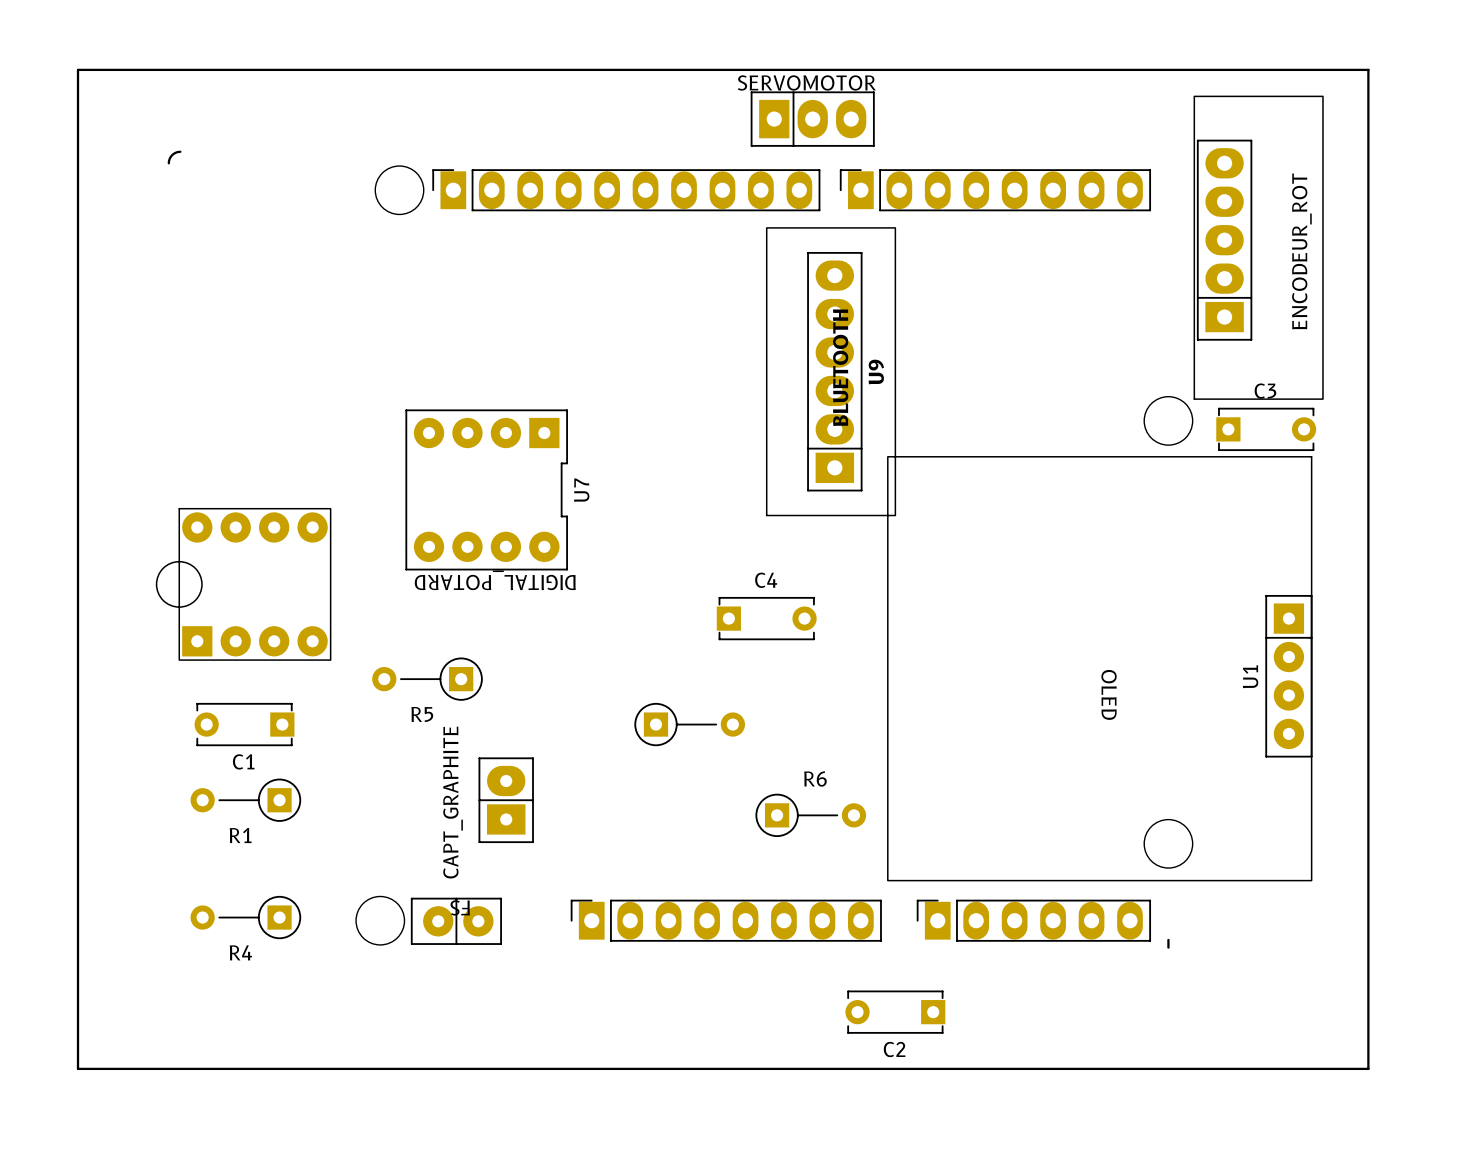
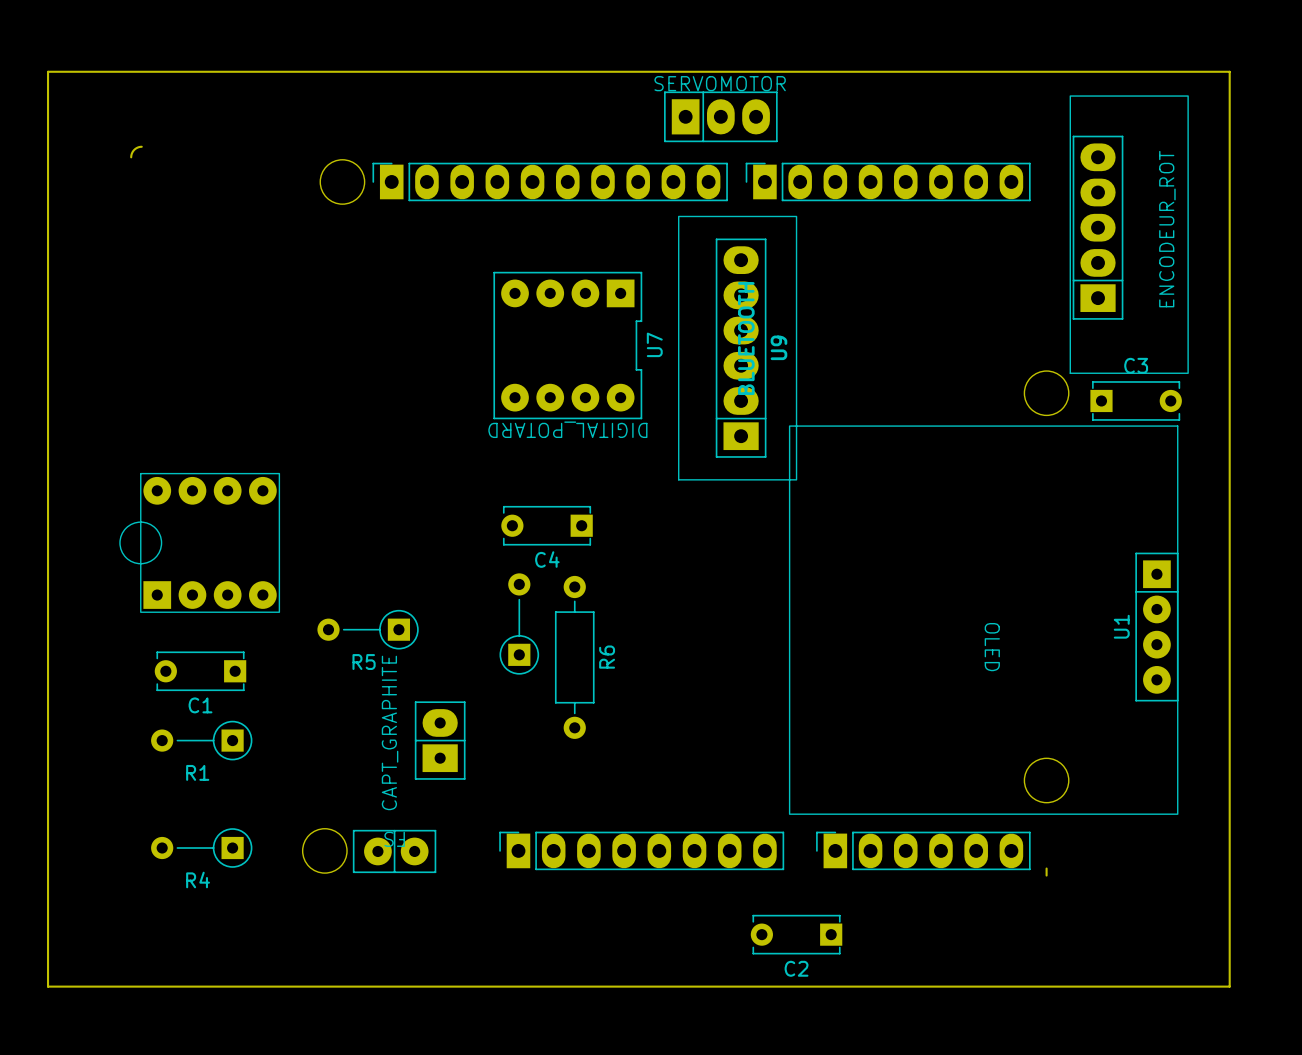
U7 position: (486, 489) -> (567, 345)
C4 rotation: 0° (766, 618) -> 180° (547, 525)
C4 position: (766, 618) -> (547, 525)
part rotation: 0° (689, 724) -> 90° counterclockwise (519, 624)
part position: (689, 724) -> (519, 624)
R6 name position: R6 (815, 779) -> R6 (607, 657)
R6 footprint: [755, 793, 867, 838] -> [554, 575, 595, 739]

